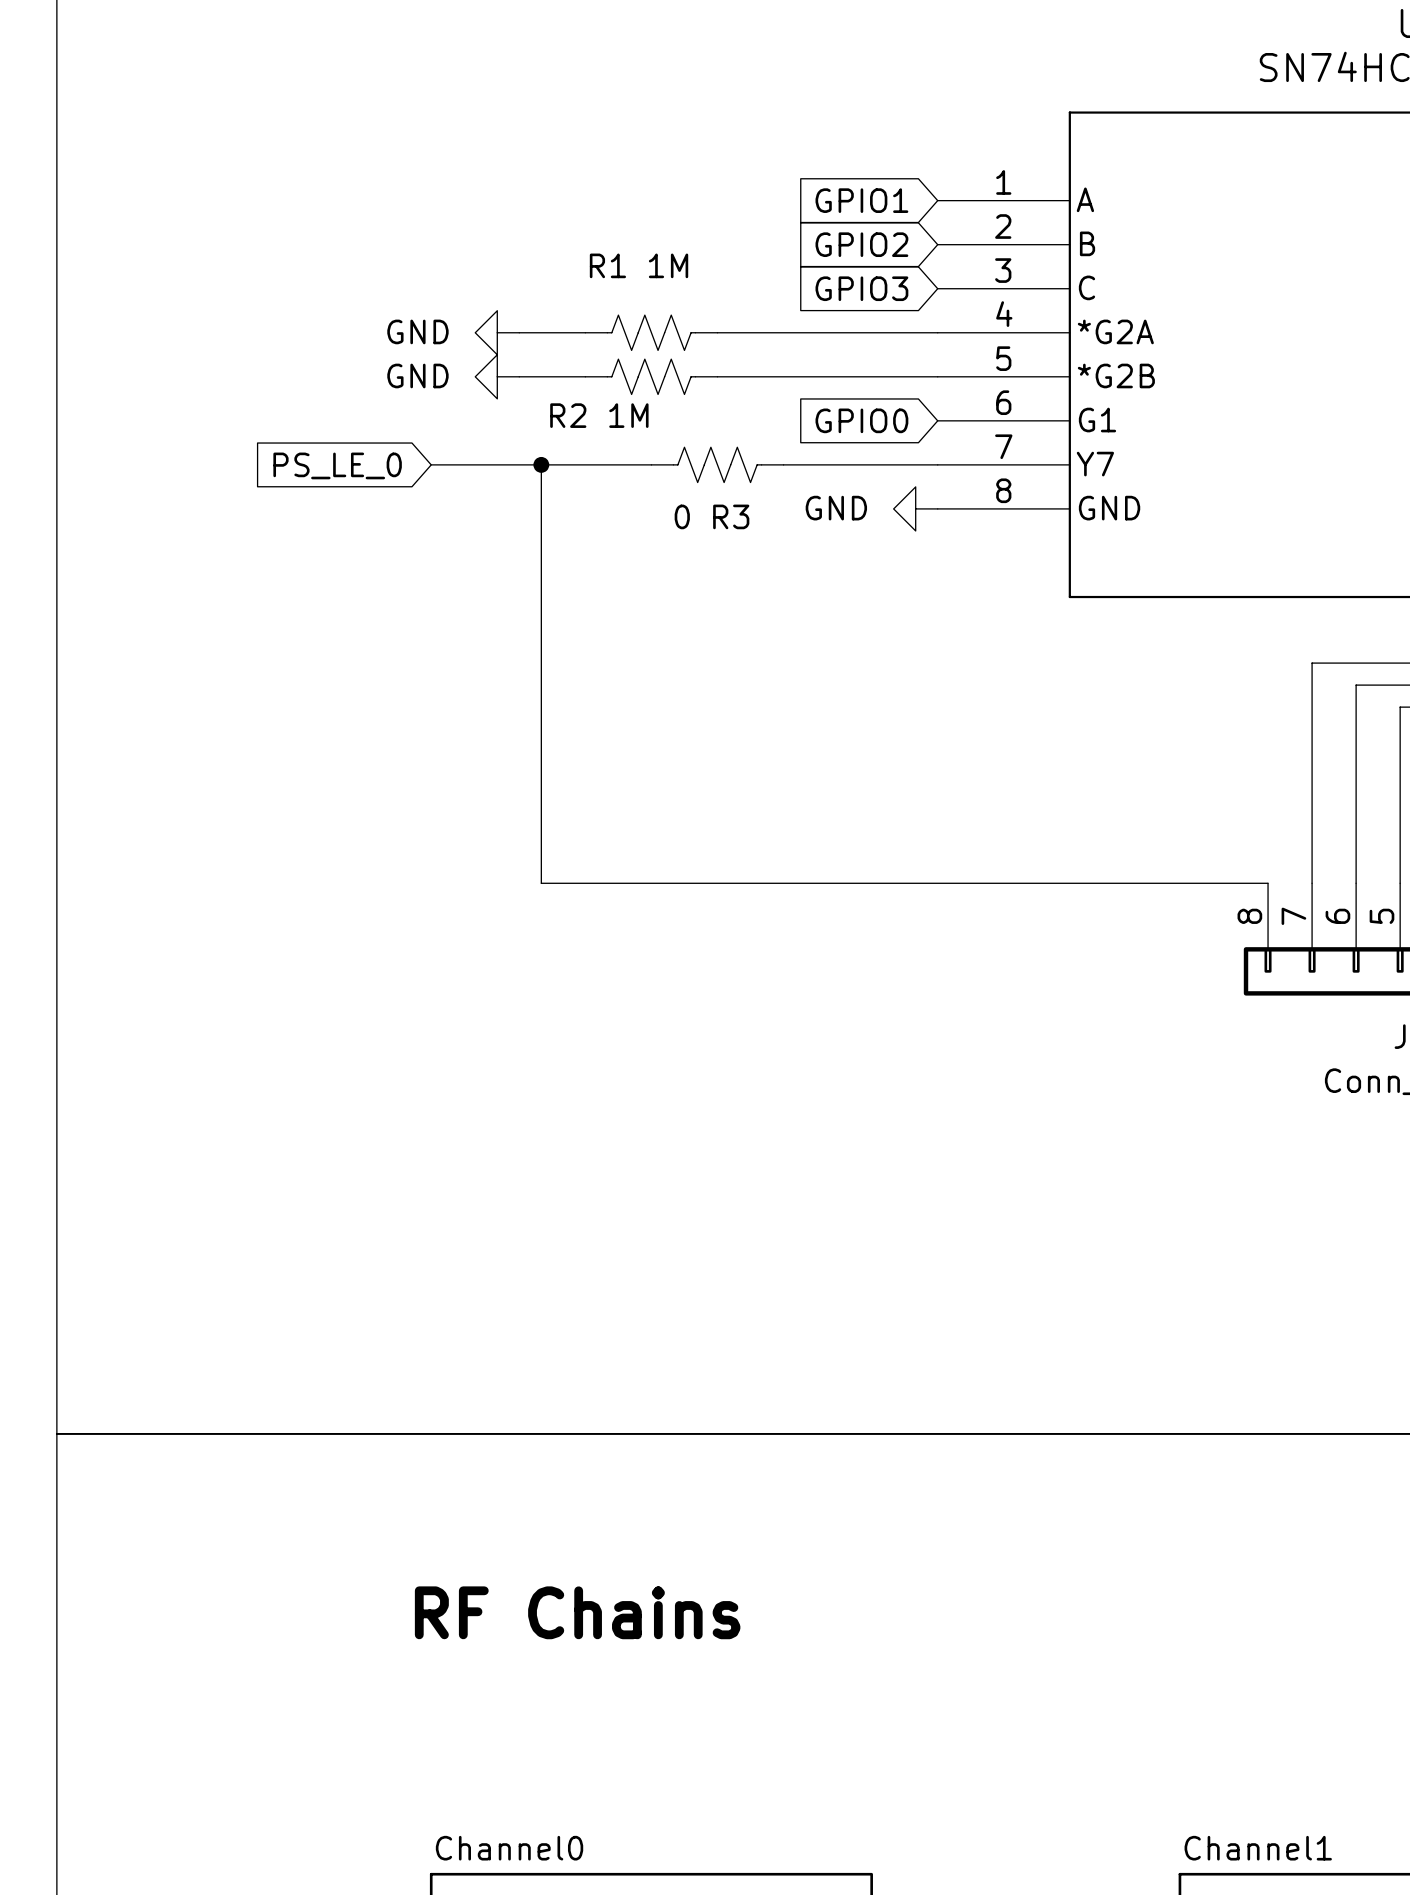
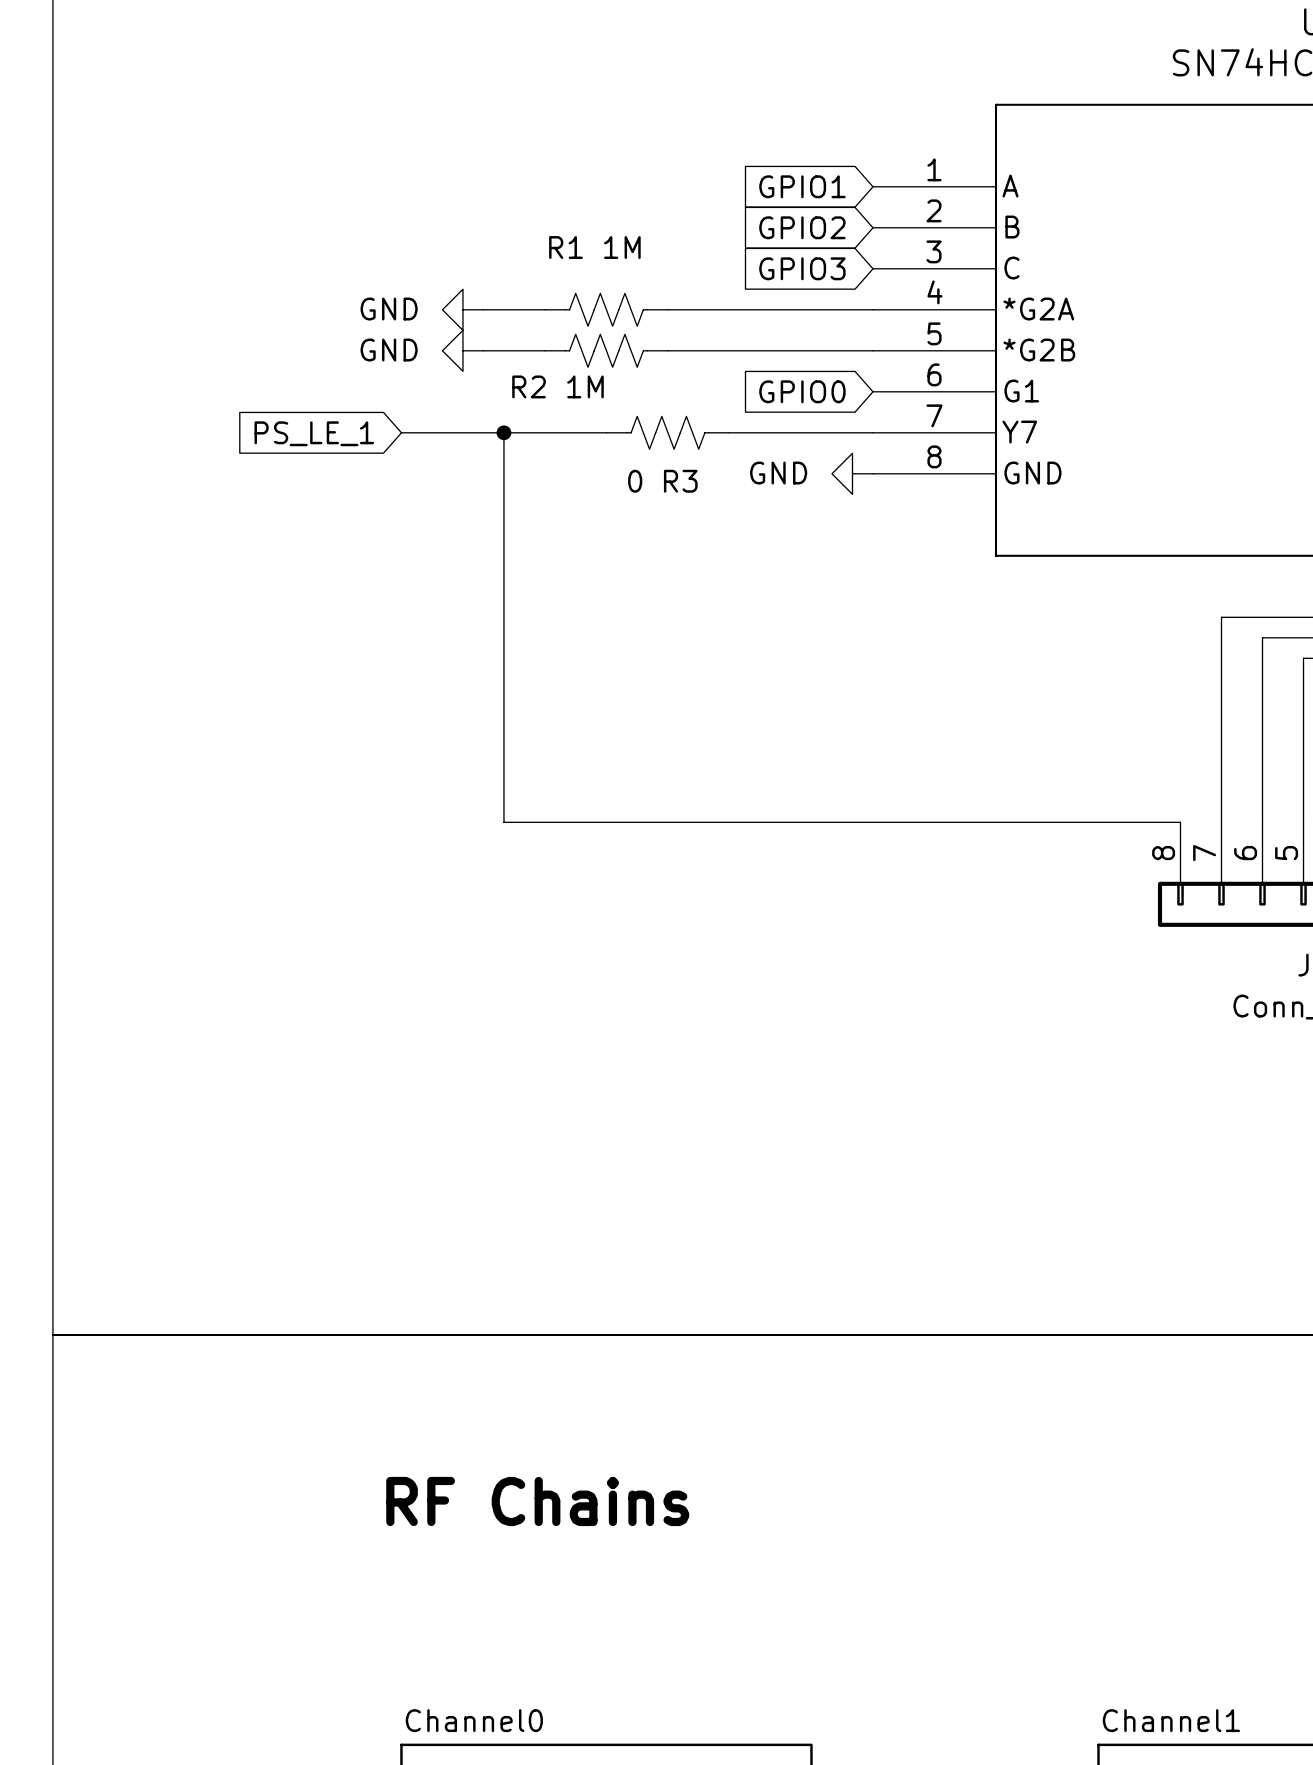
global label: PS_LE_0 (337, 465) -> PS_LE_1 (314, 433)

